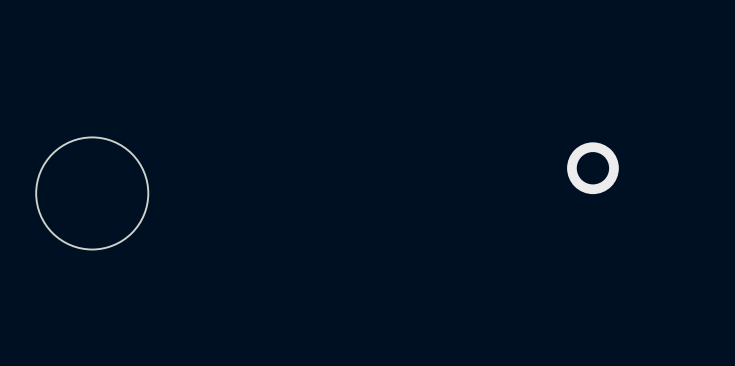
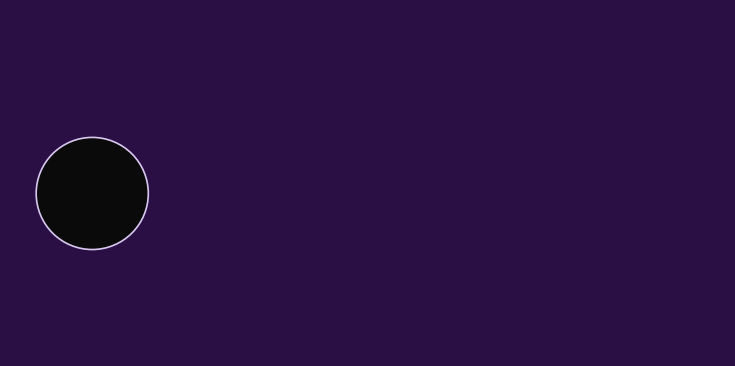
via: (592, 168) -> none

